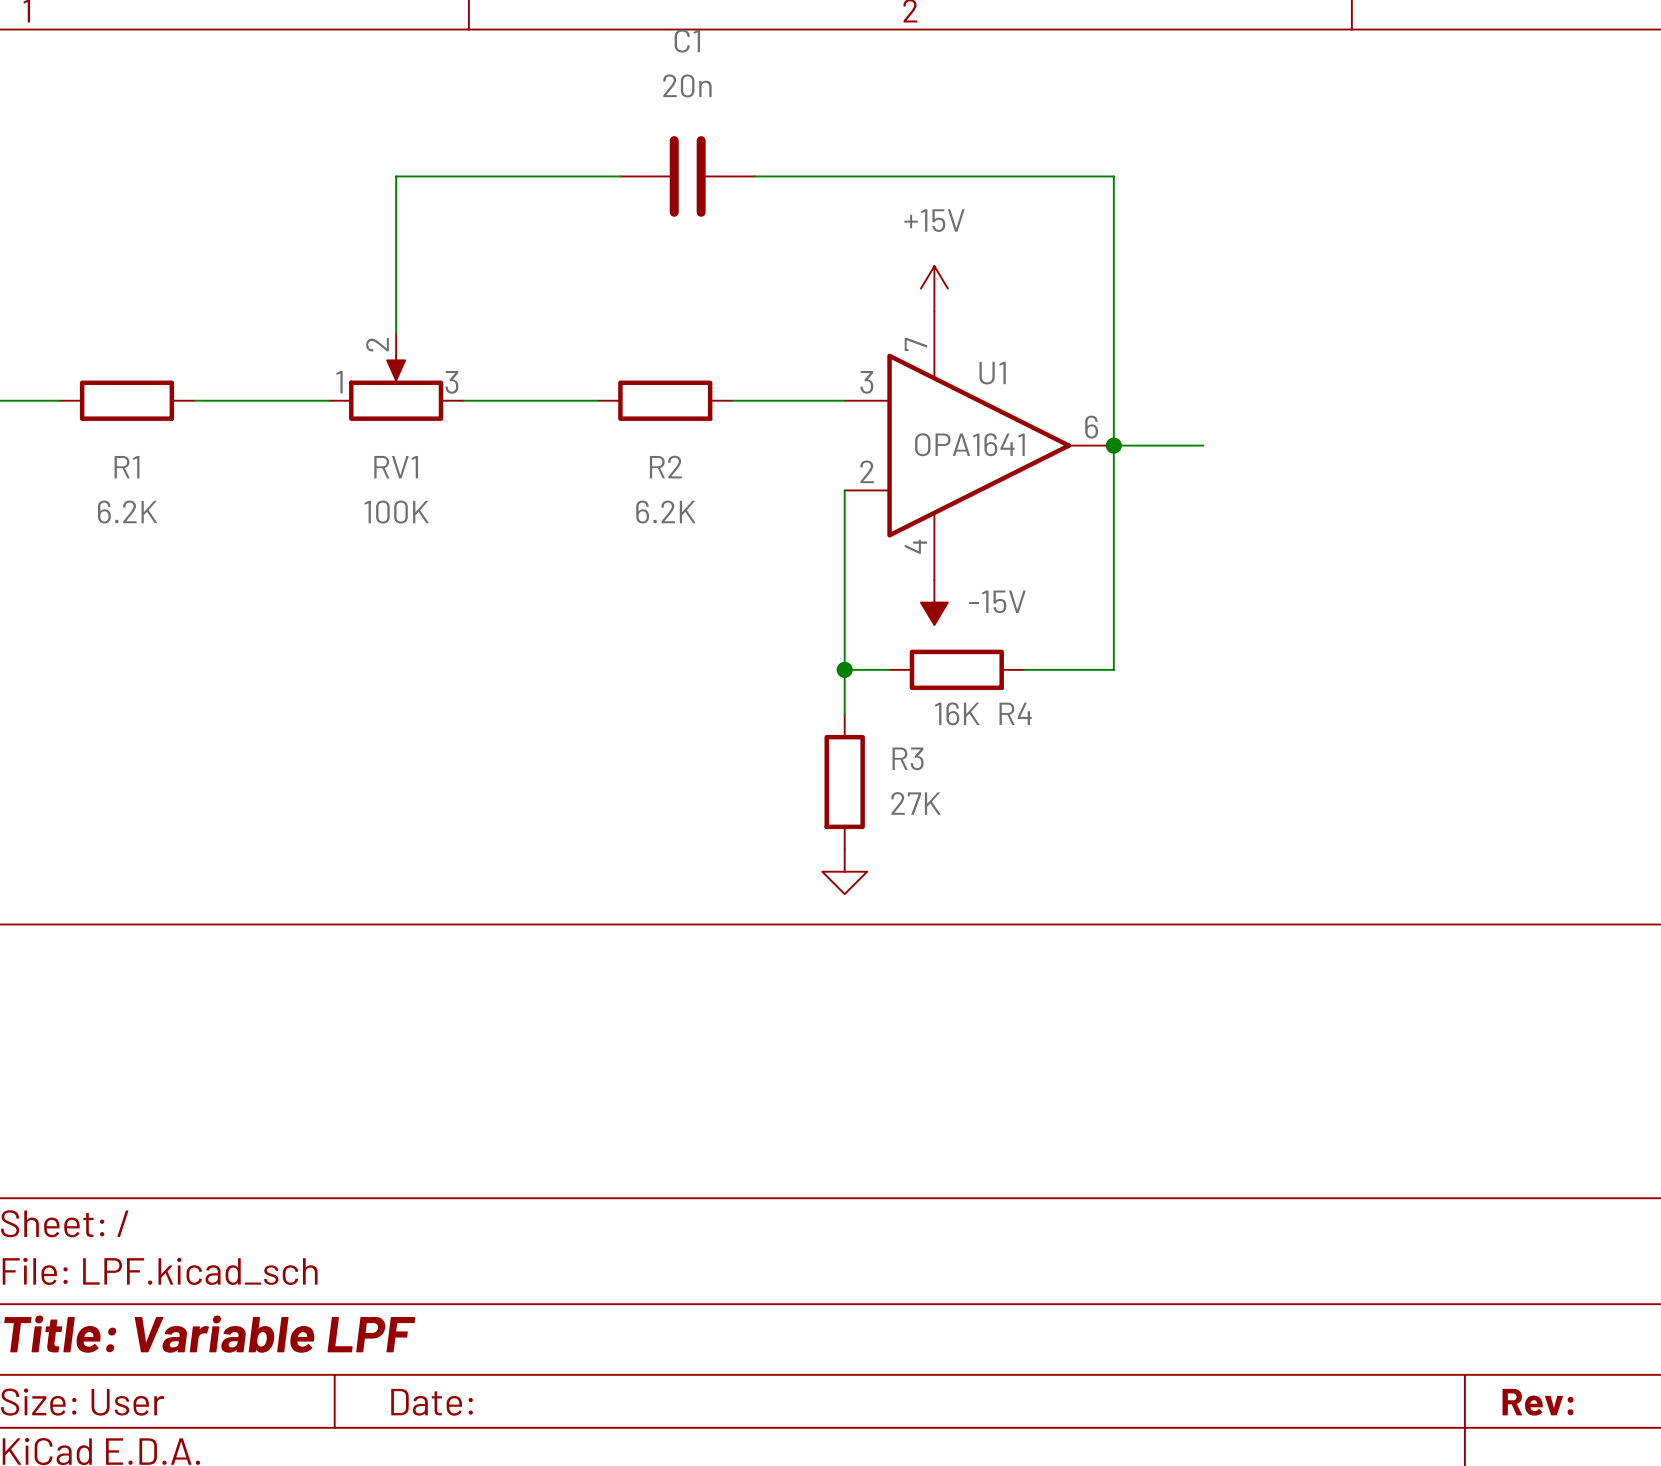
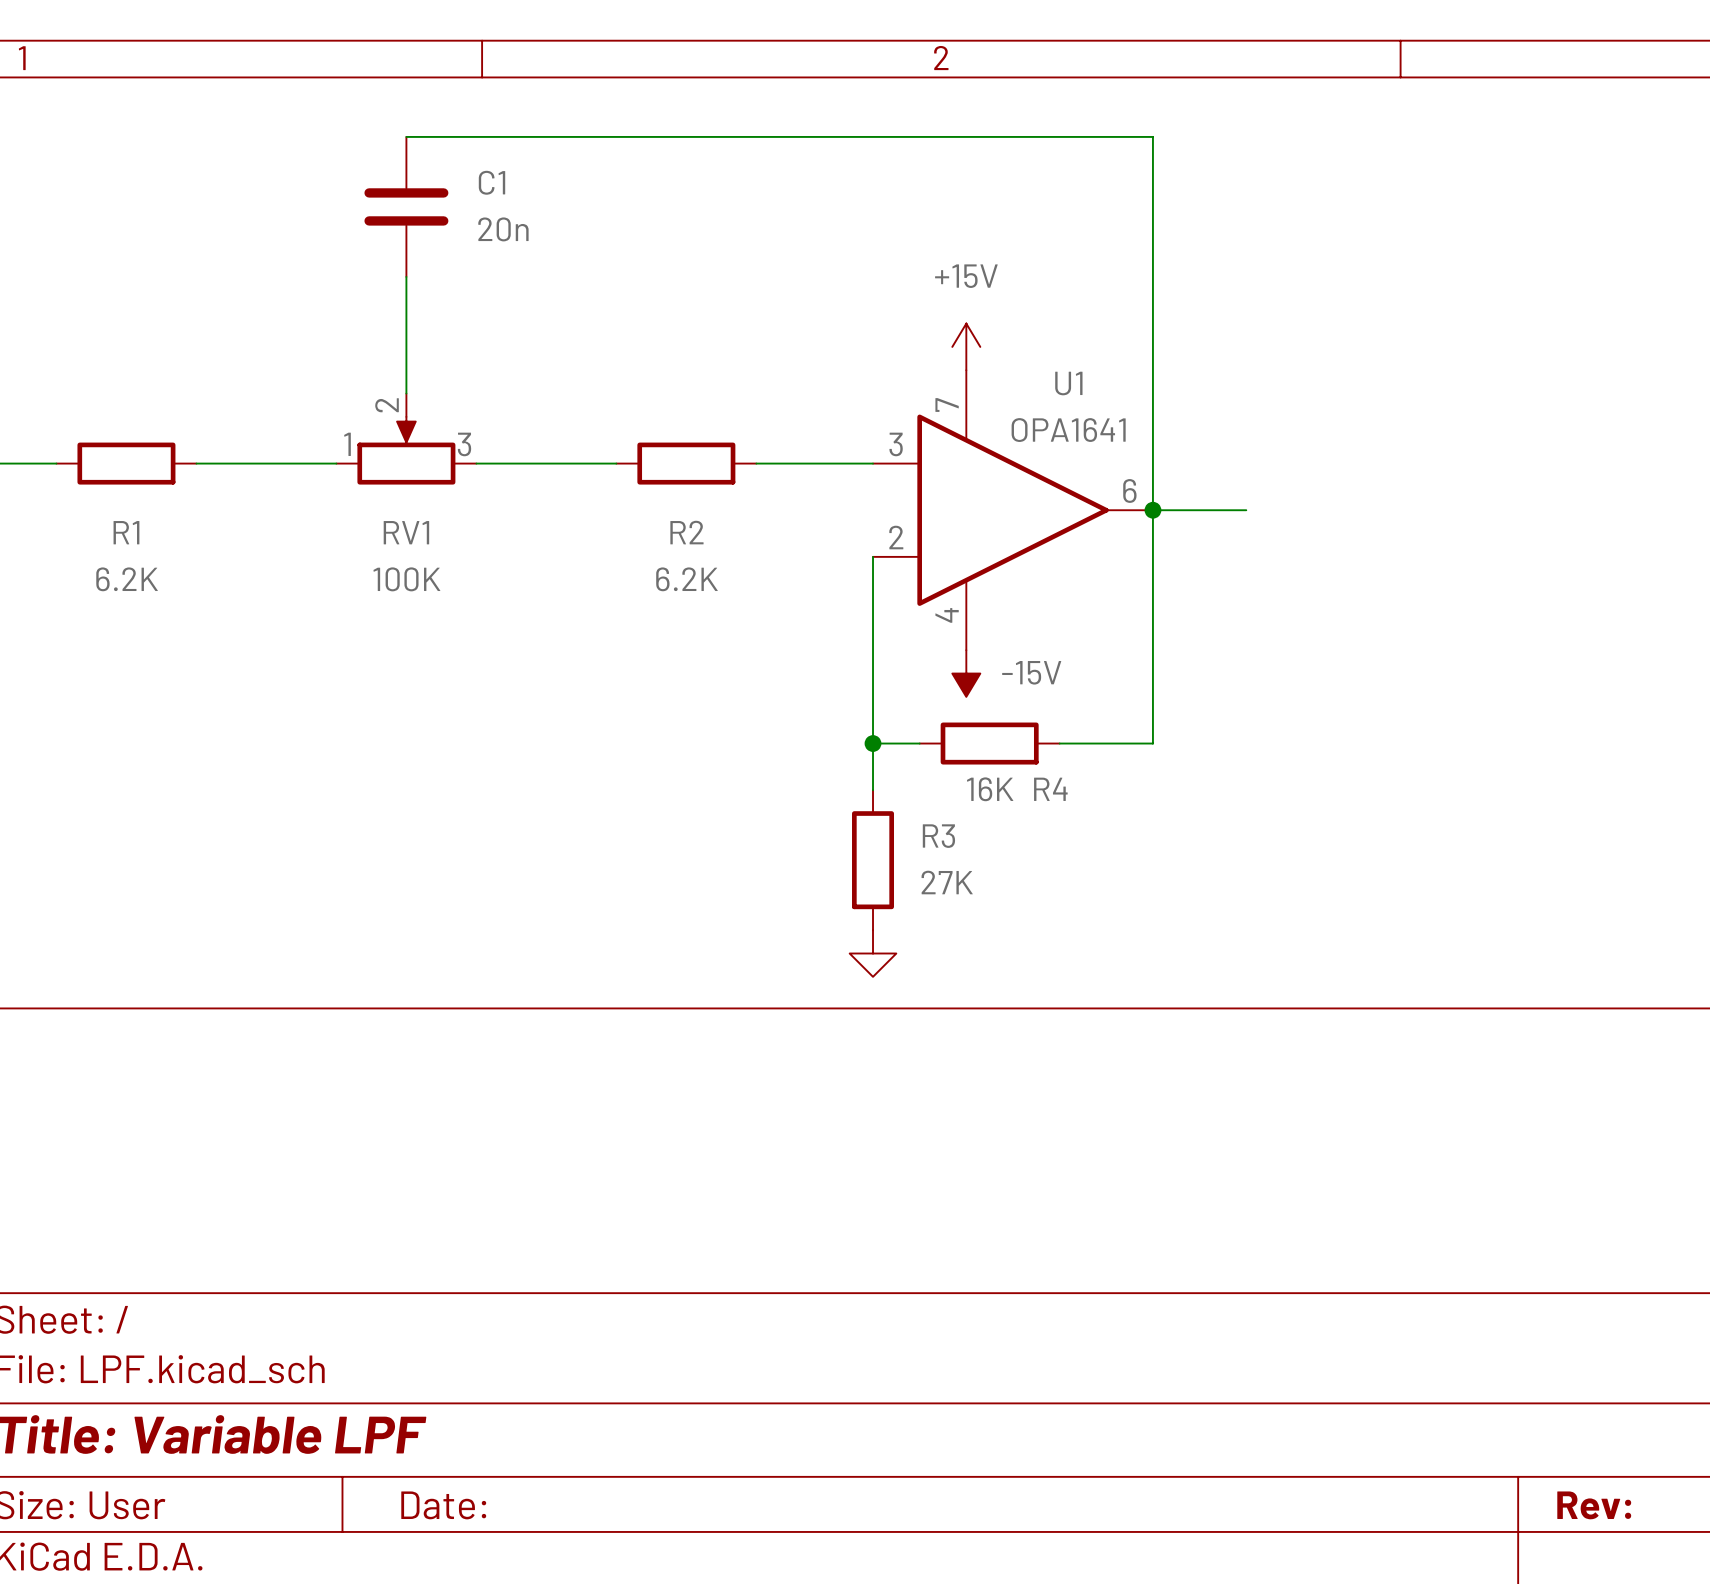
C1 name position: C1 (687, 41) -> C1 (491, 182)
wire: (620, 176) (396, 176) (396, 221) -> none
C1 rotation: 0° (687, 176) -> 90° clockwise (406, 206)
C1 position: (687, 176) -> (406, 206)
wire: (754, 176) (1113, 176) -> (406, 136) (1152, 136) (1152, 230)
U1 name position: U1 (992, 373) -> U1 (1068, 383)
U1 value position: OPA1641 (969, 444) -> OPA1641 (1068, 430)

